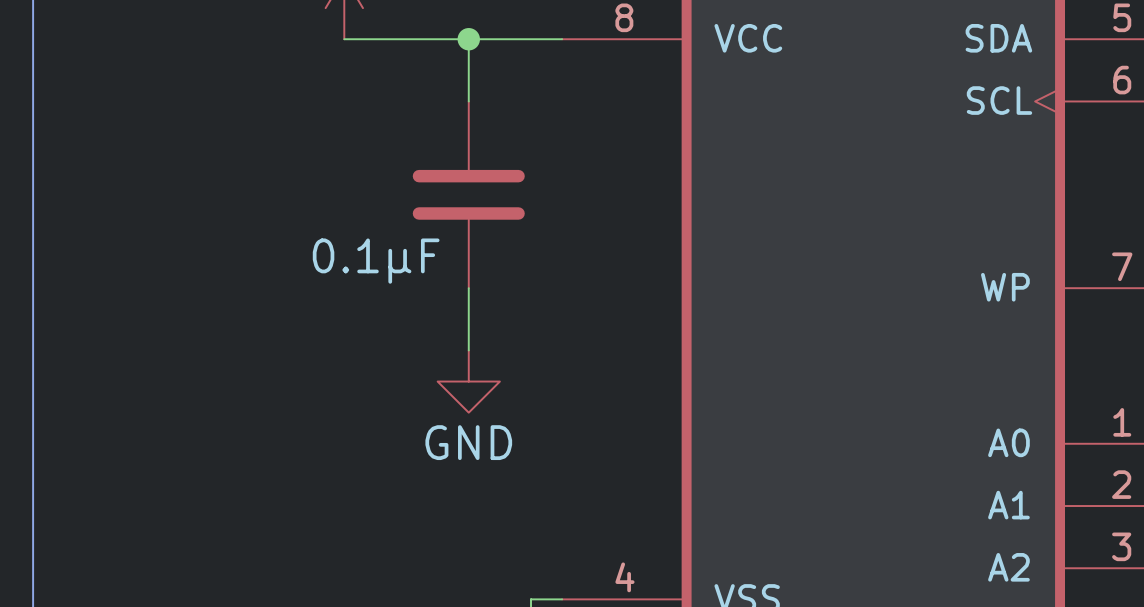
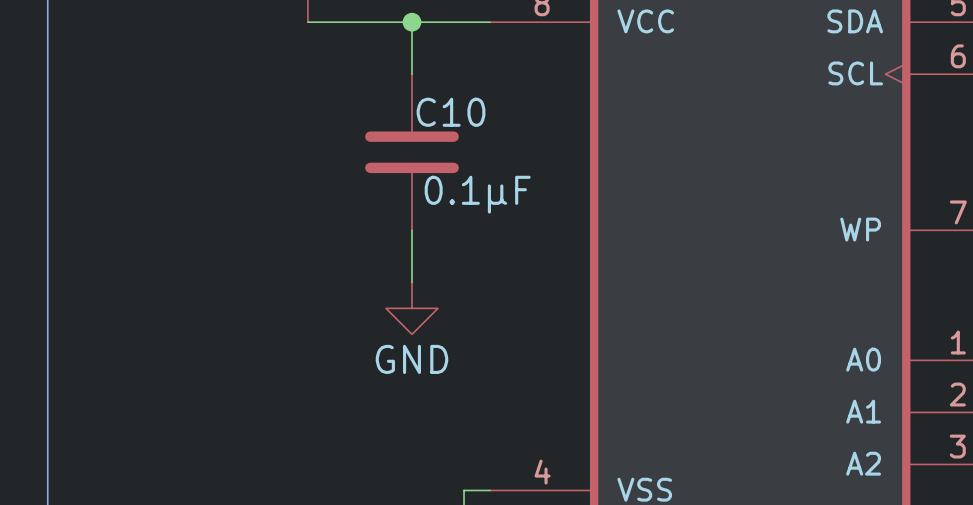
C10 name: none -> C10 (451, 112)
C10 value position: 0.1µF (376, 261) -> 0.1µF (477, 194)

